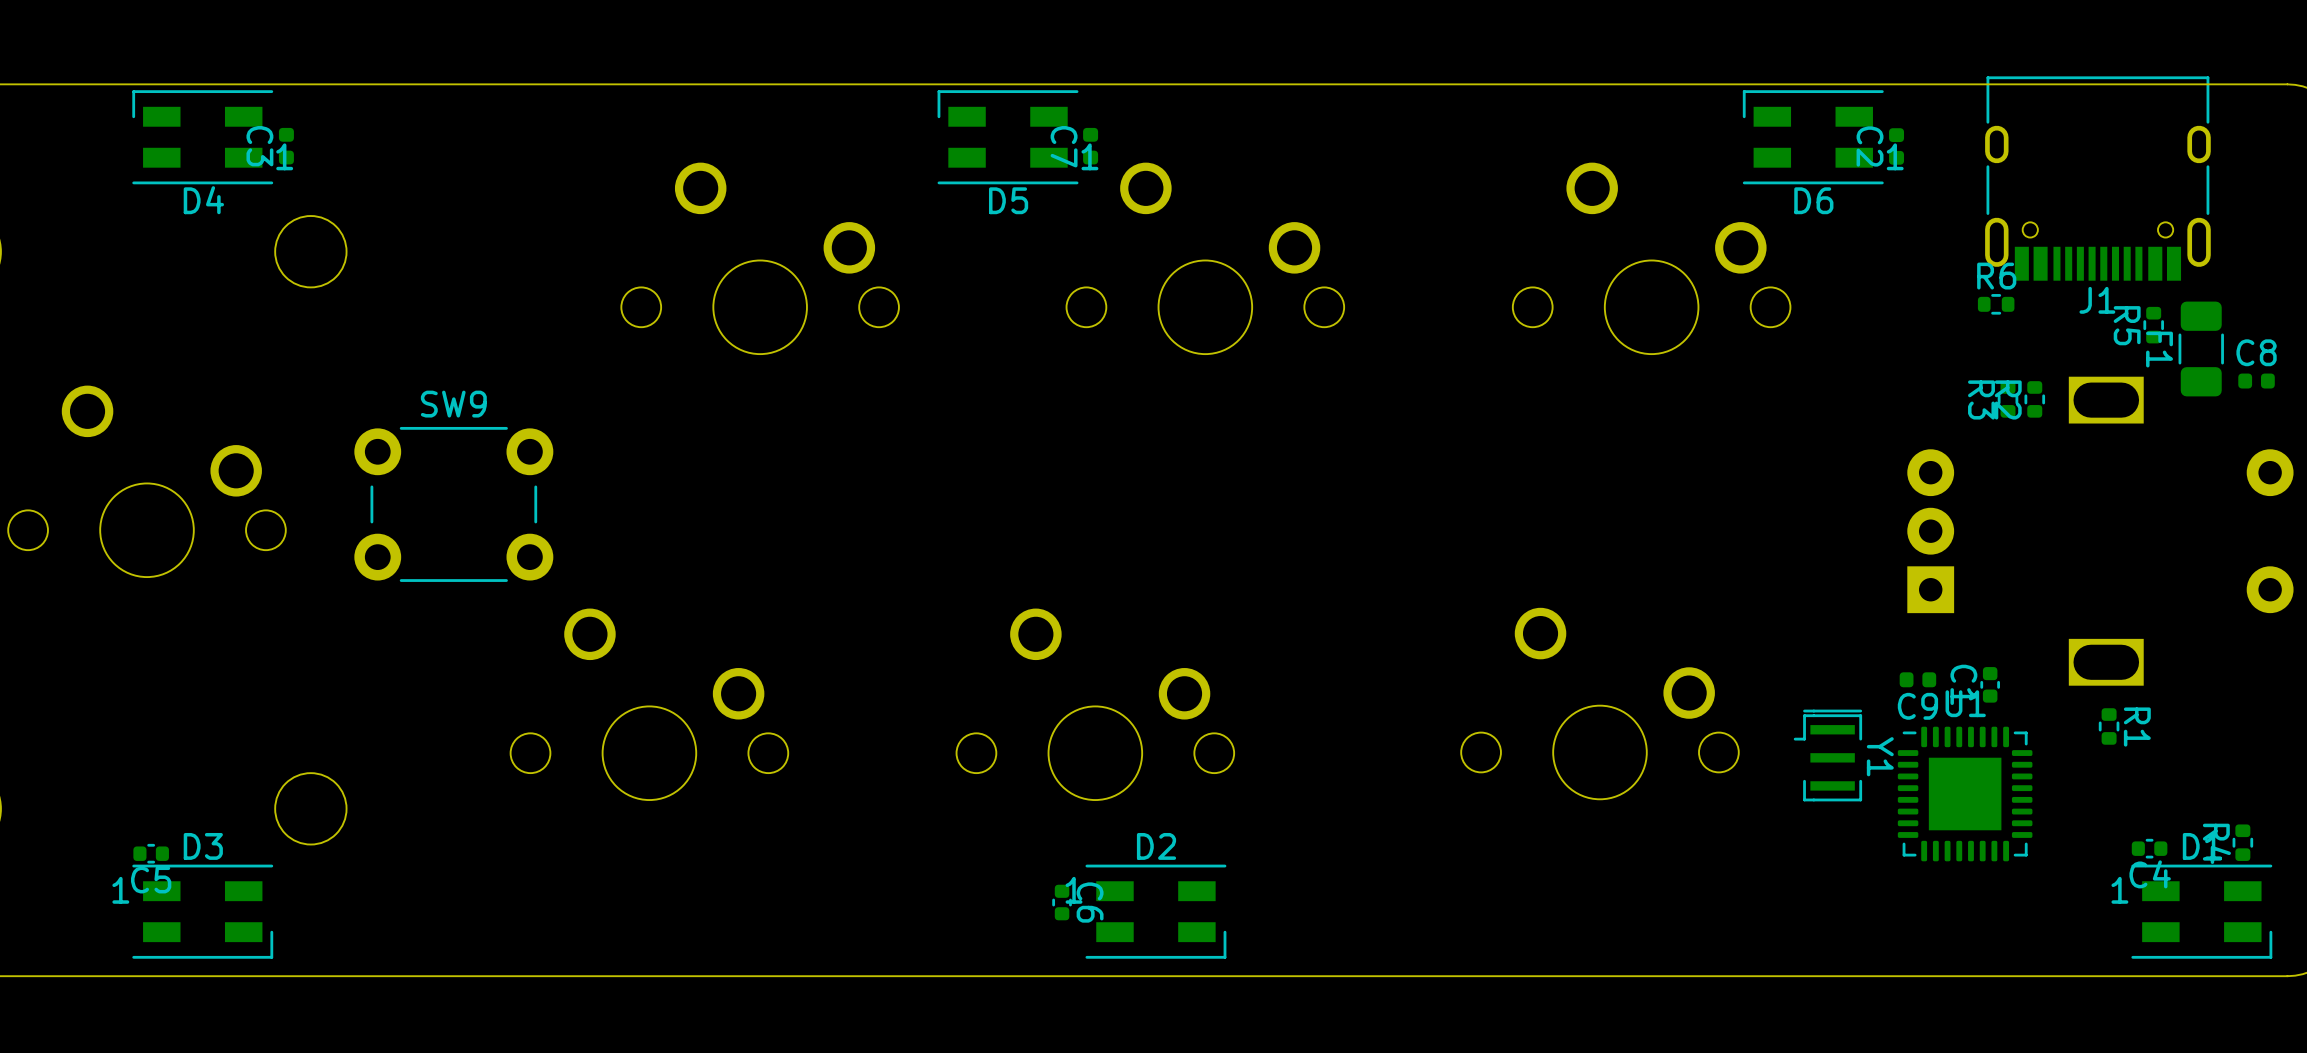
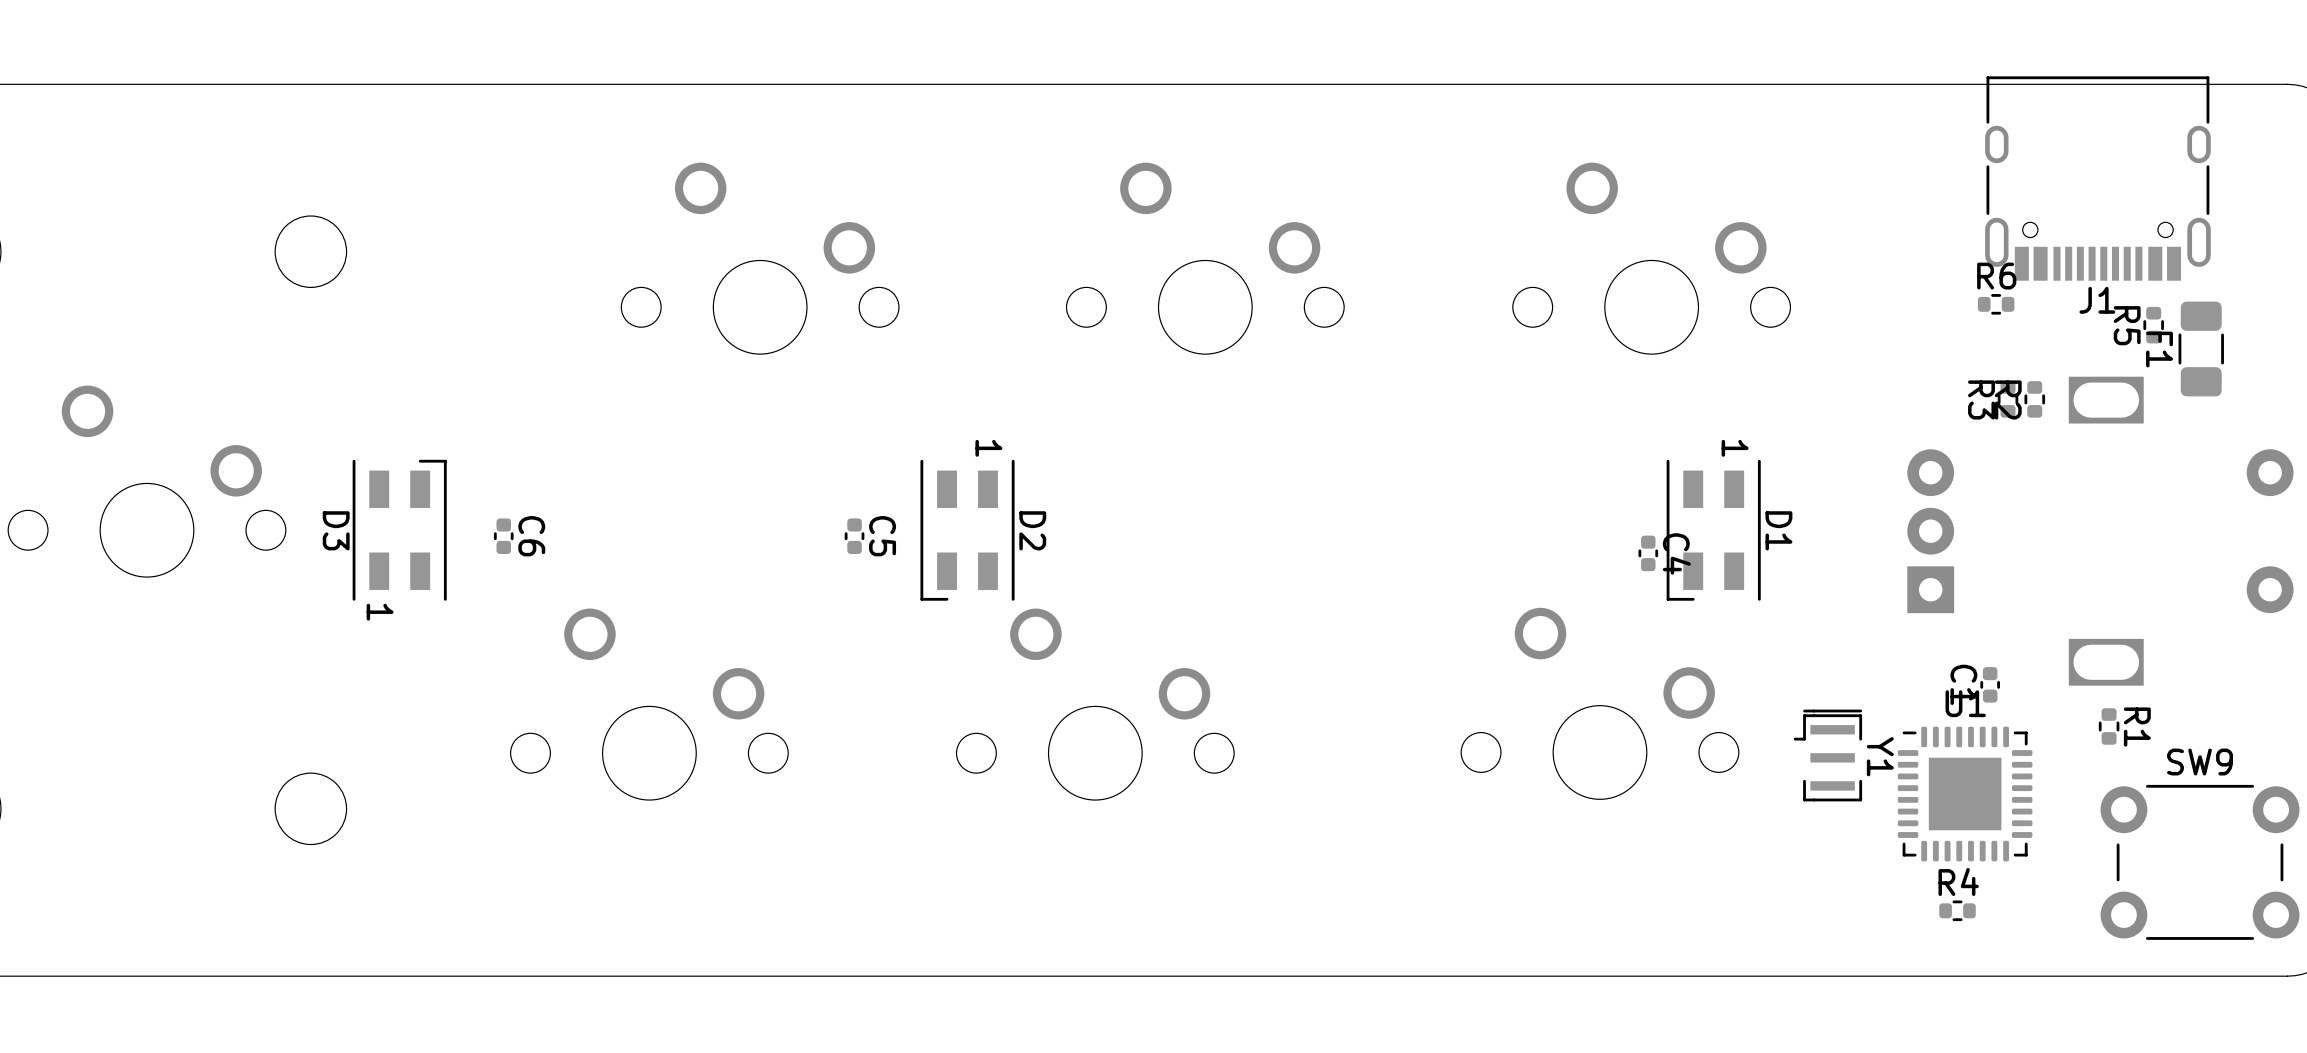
D4: (202, 137) -> none
D5: (1008, 137) -> none
D6: (1813, 137) -> none
C3: (286, 146) -> none
C7: (1090, 146) -> none
C2: (1896, 146) -> none
C8: (2256, 381) -> none
SW9 position: (453, 504) -> (2200, 862)
C9: (1917, 679) -> none
R4 rotation: 0° (2242, 842) -> 90° clockwise (1957, 910)
R4 position: (2242, 842) -> (1957, 910)
C4 rotation: 0° (2149, 848) -> 90° clockwise (1648, 553)
C4 position: (2149, 848) -> (1648, 553)
C5 rotation: 0° (151, 853) -> 90° clockwise (854, 536)
C5 position: (151, 853) -> (854, 536)
C6 position: (1062, 902) -> (503, 536)
D3 rotation: 0° (202, 911) -> 90° counterclockwise (399, 530)
D3 position: (202, 911) -> (399, 530)
D2 rotation: 0° (1155, 911) -> 90° clockwise (967, 530)
D2 position: (1155, 911) -> (967, 530)
D1 rotation: 0° (2201, 911) -> 90° clockwise (1713, 530)
D1 position: (2201, 911) -> (1713, 530)

